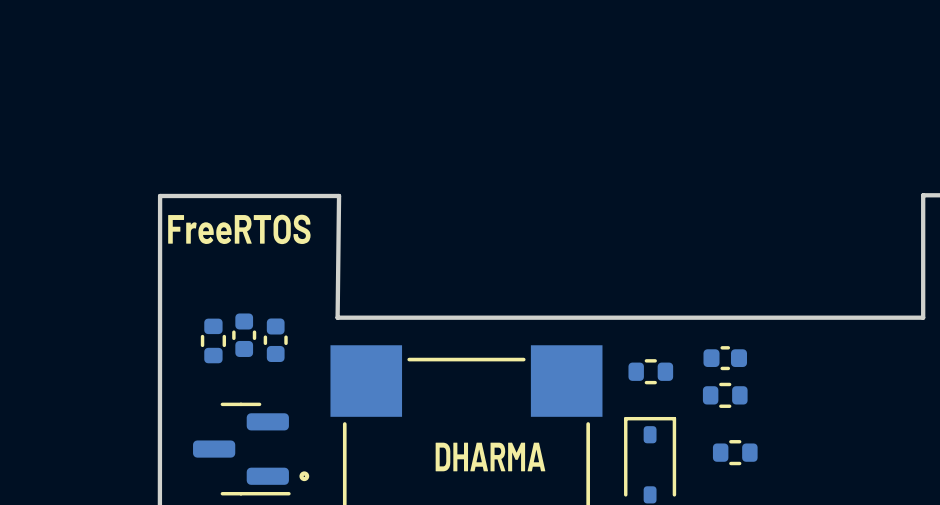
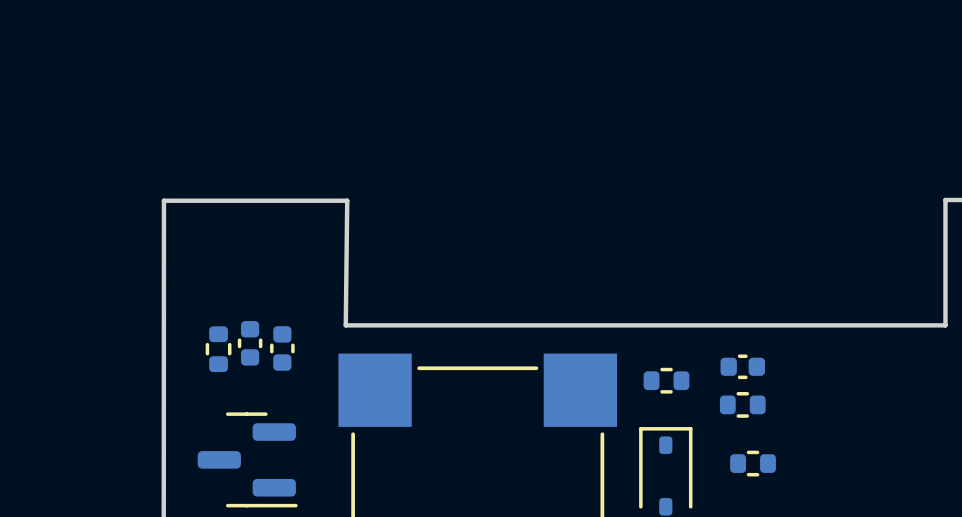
text: FreeRTOS (239, 229) -> none
text: DHARMA (490, 456) -> none
drawing: [299, 471, 310, 482] -> none

